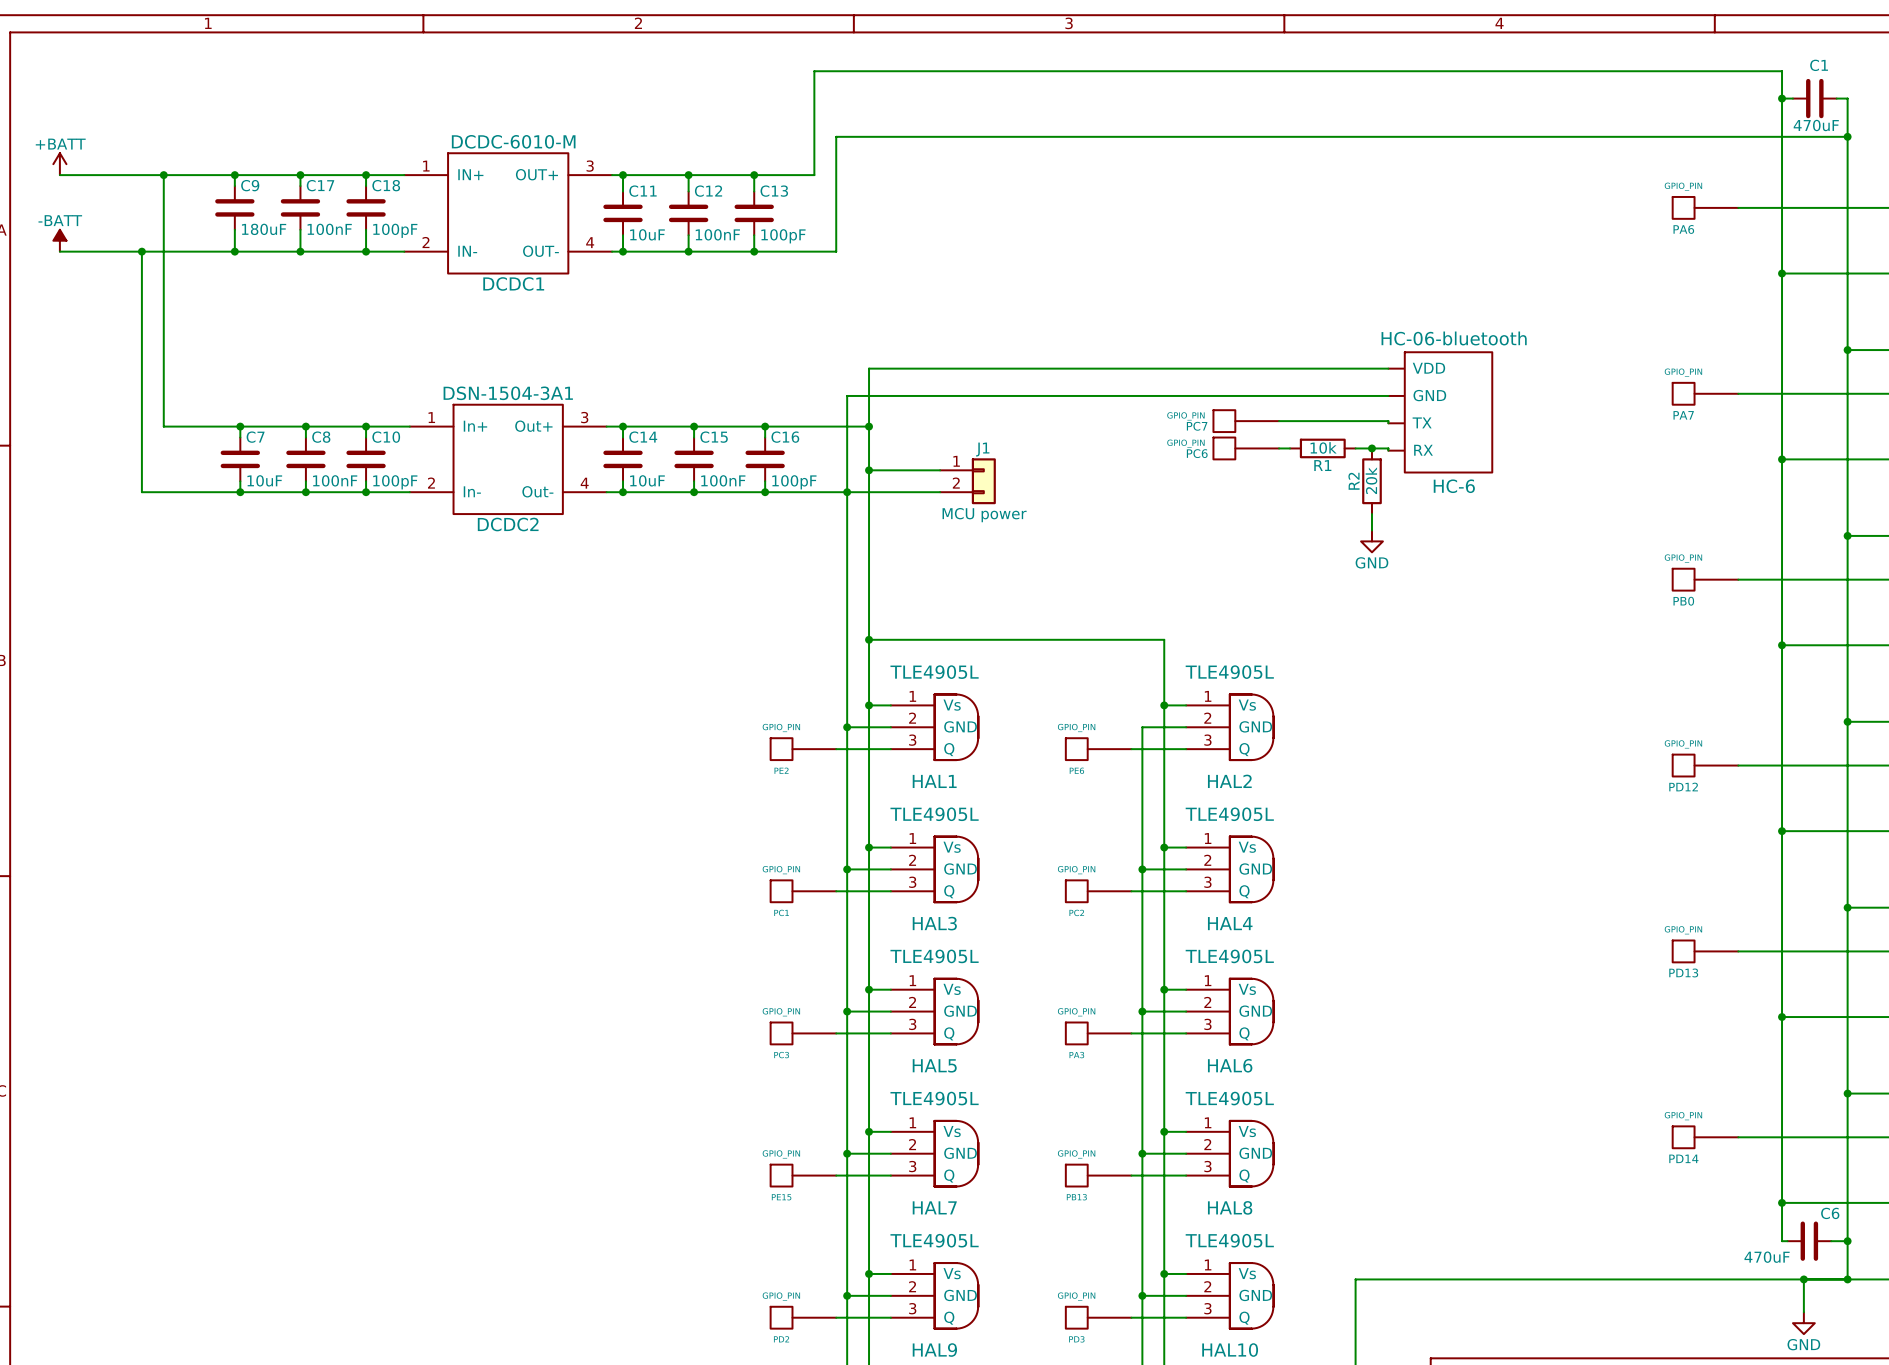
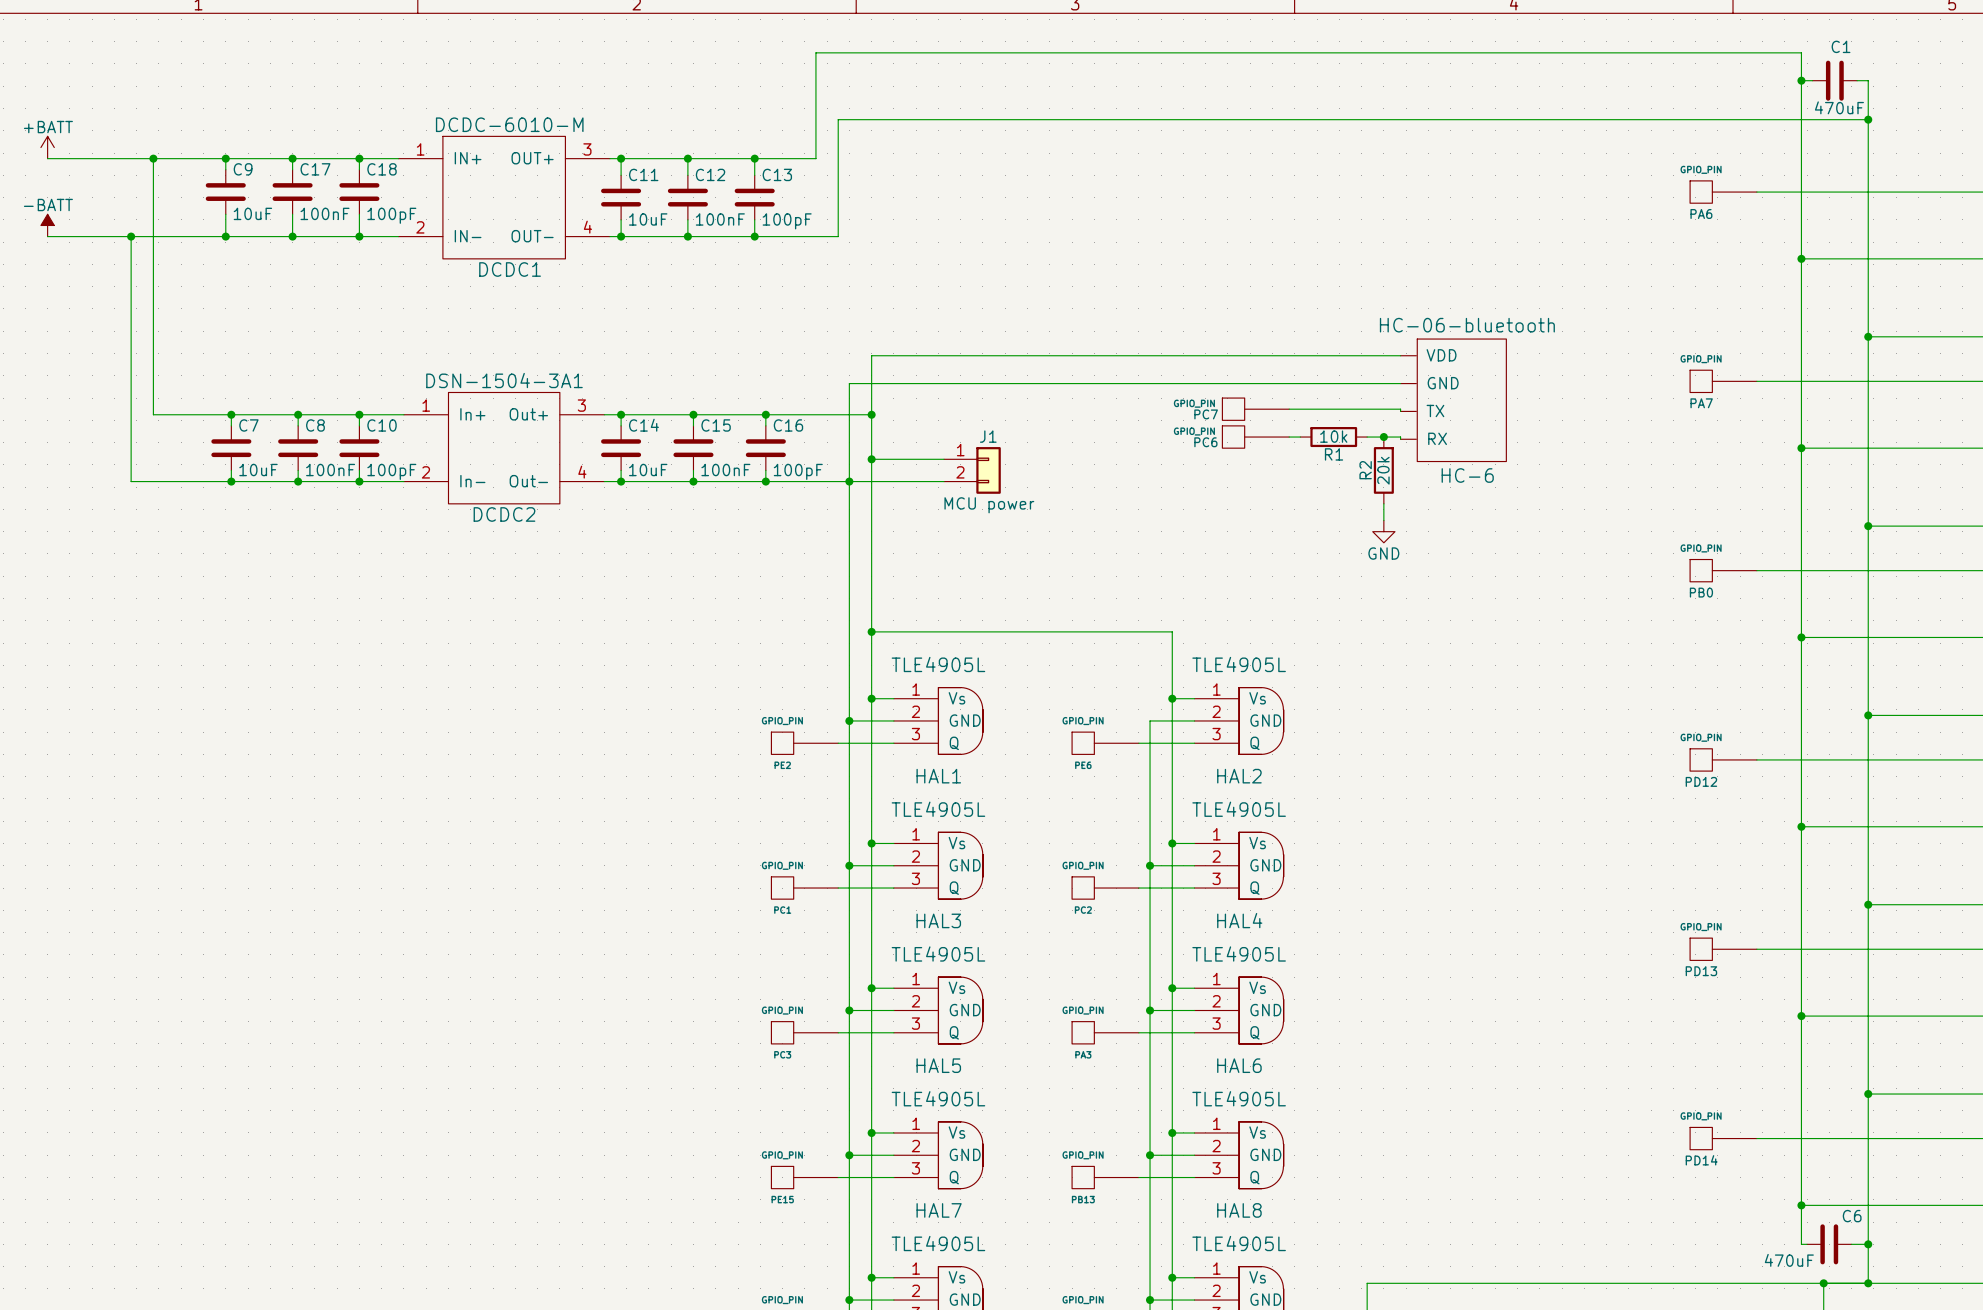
C9 value: 180uF (264, 229) -> 10uF (252, 213)

